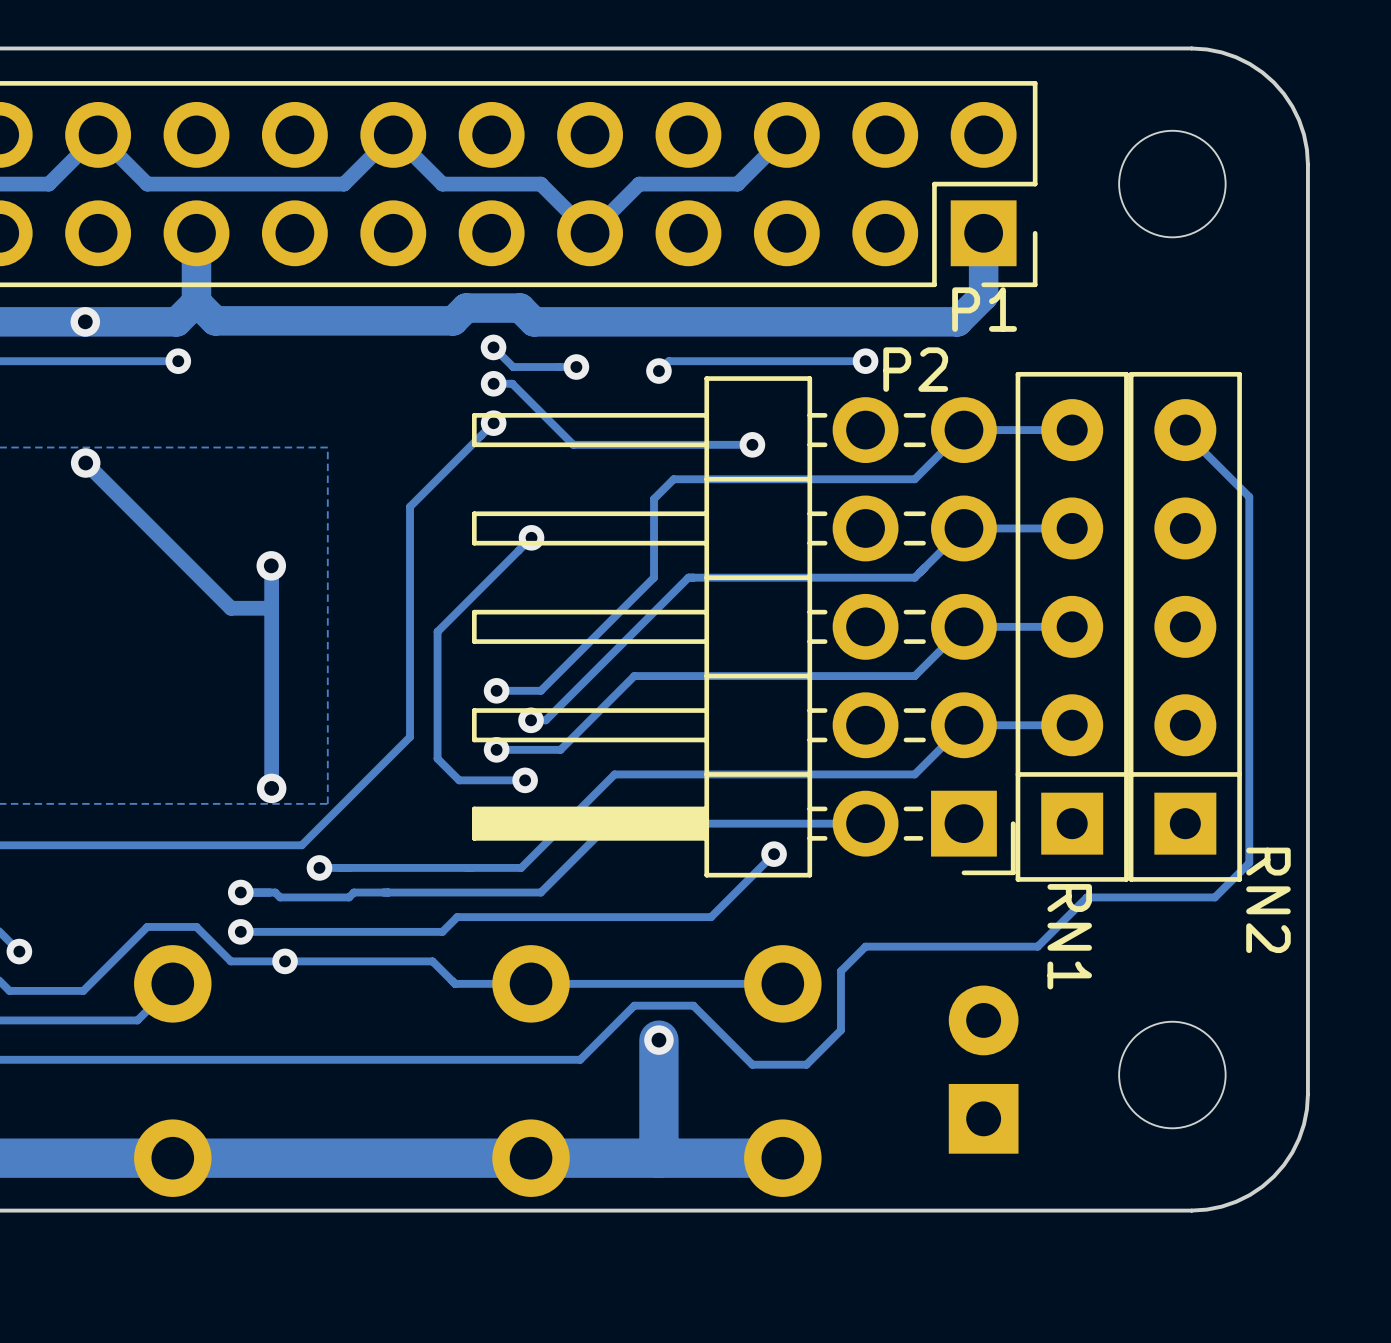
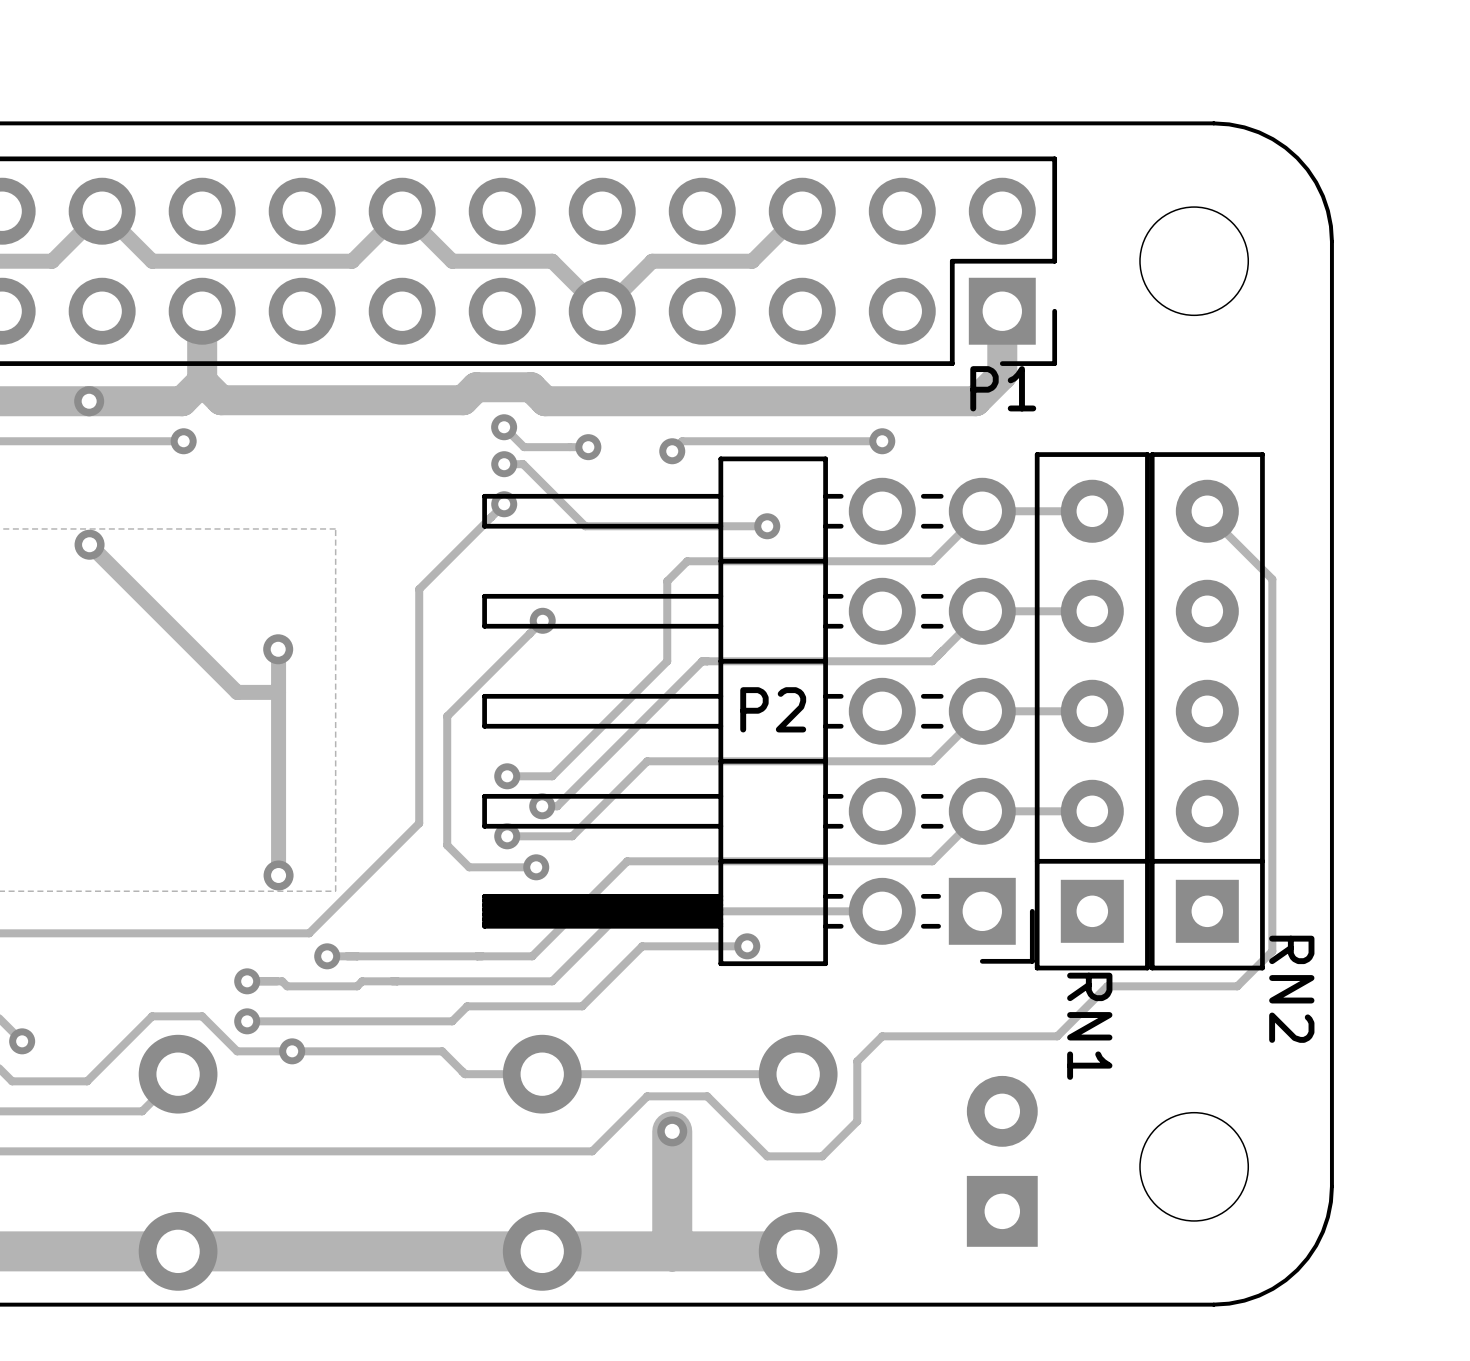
P2 name position: P2 (915, 369) -> P2 (773, 709)
track: (774, 854) (711, 917) (570, 917) -> (747, 946) (642, 946) (582, 1006)
via position: (774, 854) -> (747, 946)

